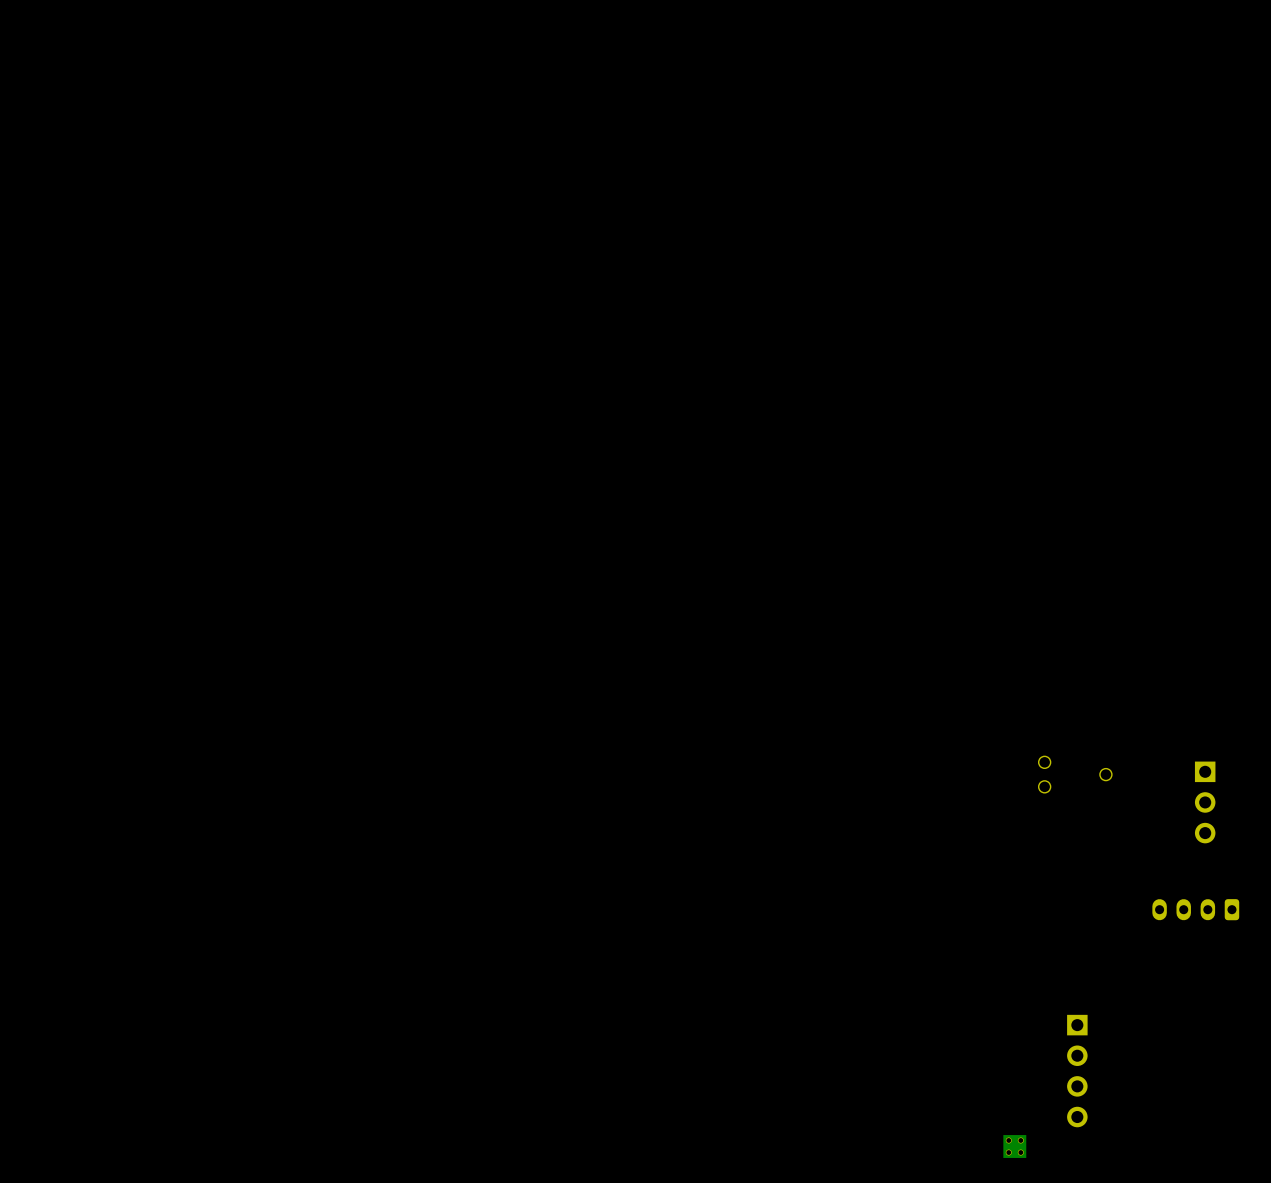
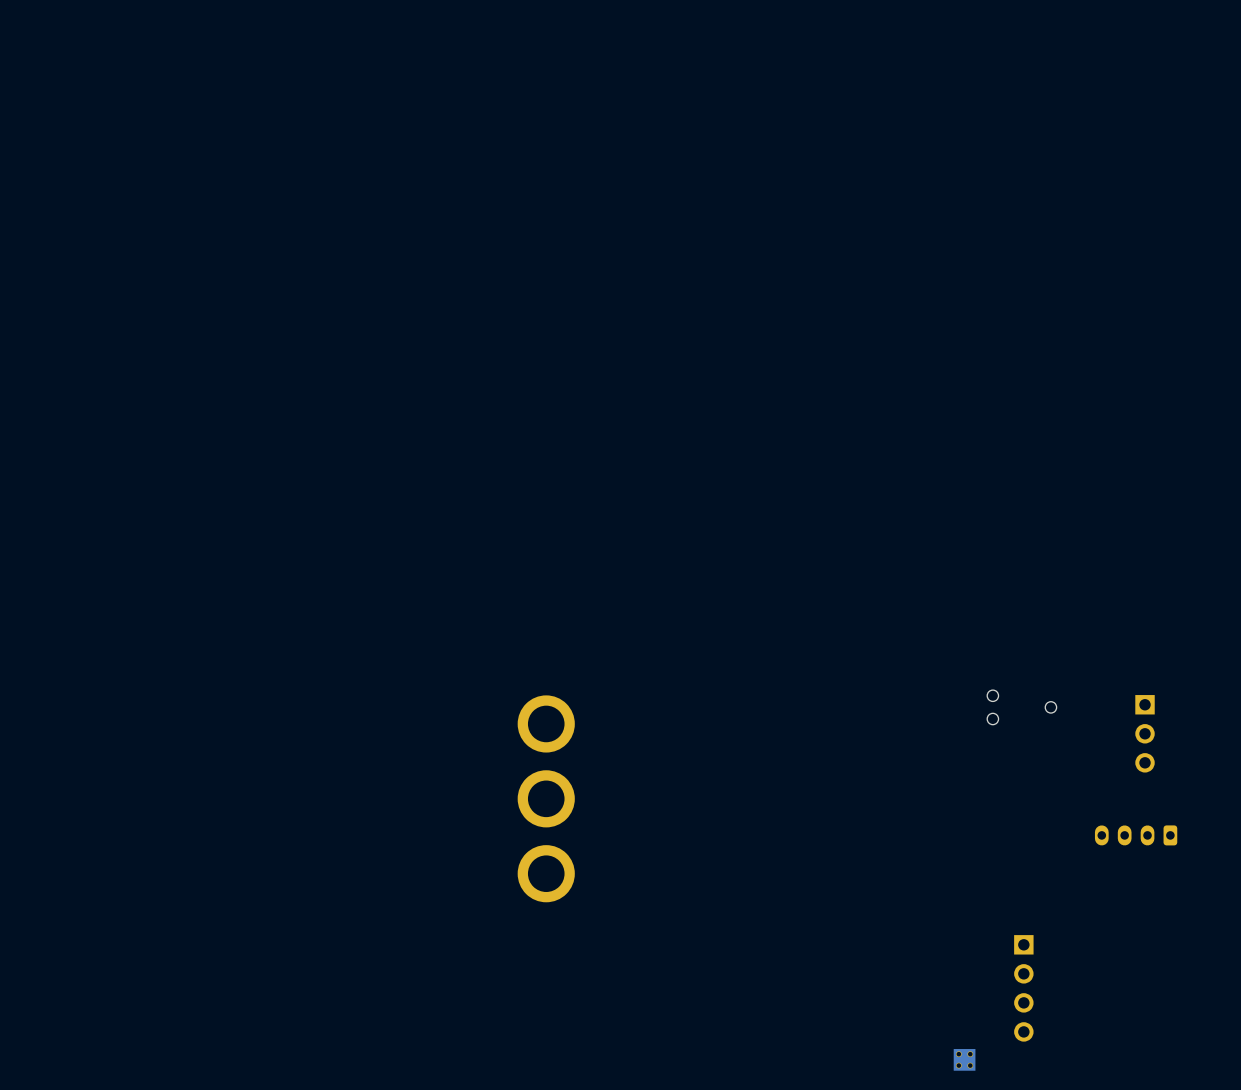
part: none -> (546, 723)
part: none -> (546, 798)
part: none -> (546, 873)

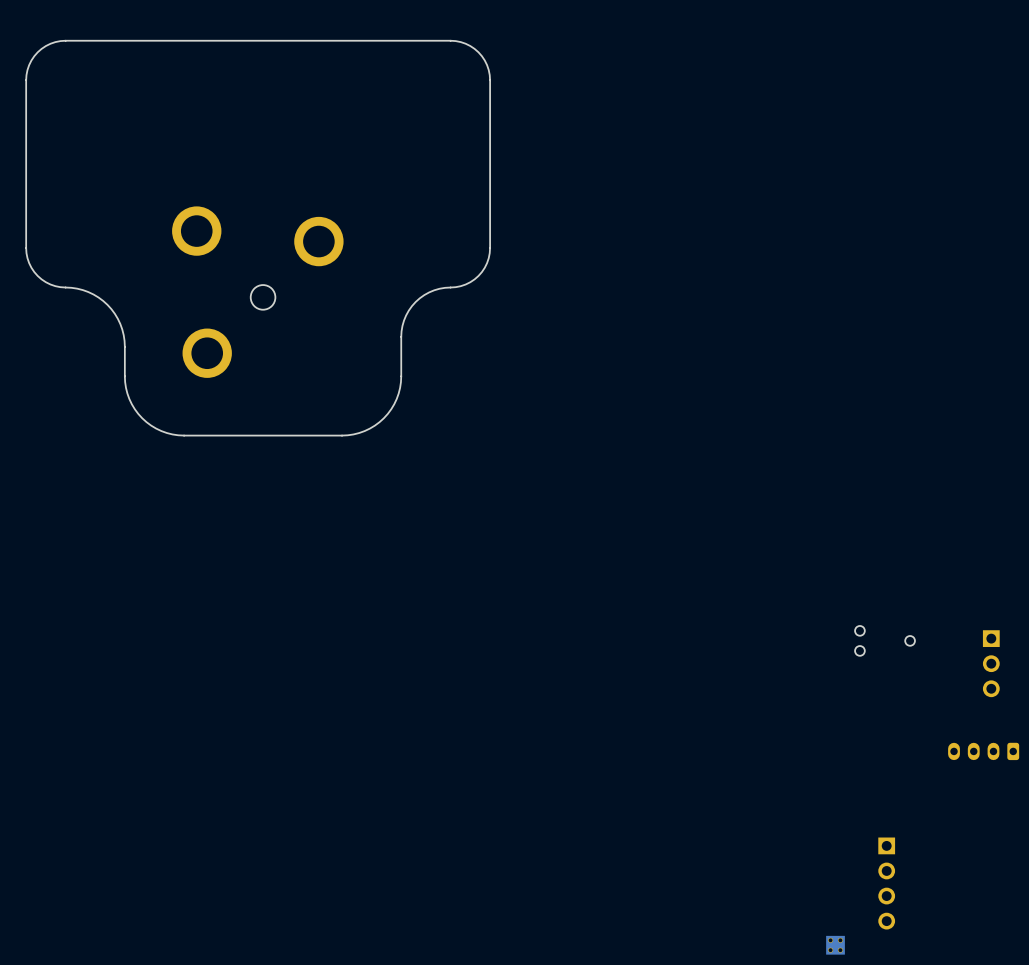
board edge: none -> (450, 40) (65, 40) (45, 46) (34, 56) (27, 70) (26, 80) (27, 258) (34, 272) (45, 282) (55, 286) (88, 292) (103, 300) (114, 313) (123, 335) (125, 382) (127, 393) (134, 409) (146, 422) (161, 431) (178, 435) (342, 435) (364, 431) (379, 422) (387, 413) (396, 399) (400, 387) (401, 331) (408, 310) (419, 298) (429, 292) (439, 288) (460, 286) (474, 279) (484, 267) (489, 253) (489, 75) (484, 60) (478, 52) (465, 43) (450, 40)
part: none -> (196, 231)
part: none -> (318, 241)
round board edge: none -> [250, 284, 276, 311]
part: none -> (207, 353)
part: (546, 723) -> none
part: (546, 798) -> none
part: (546, 873) -> none

